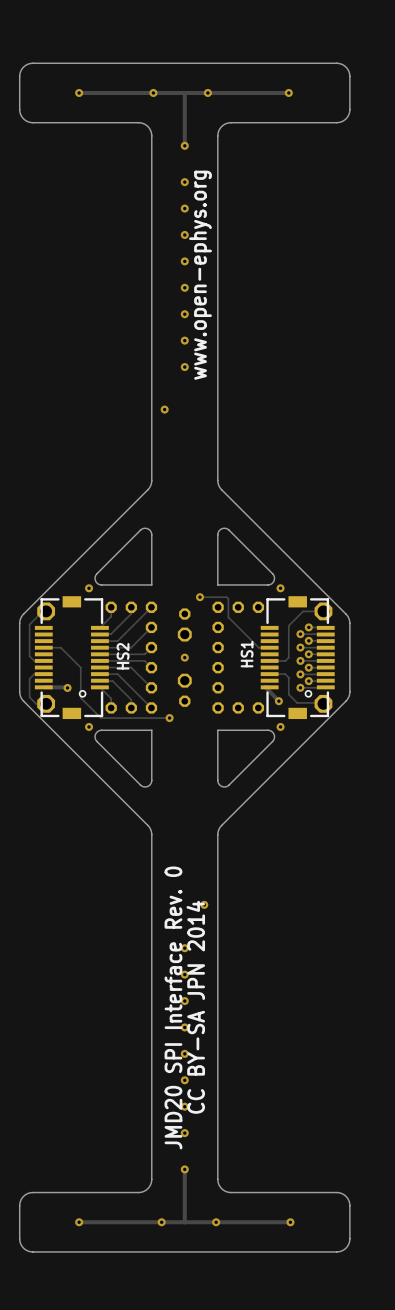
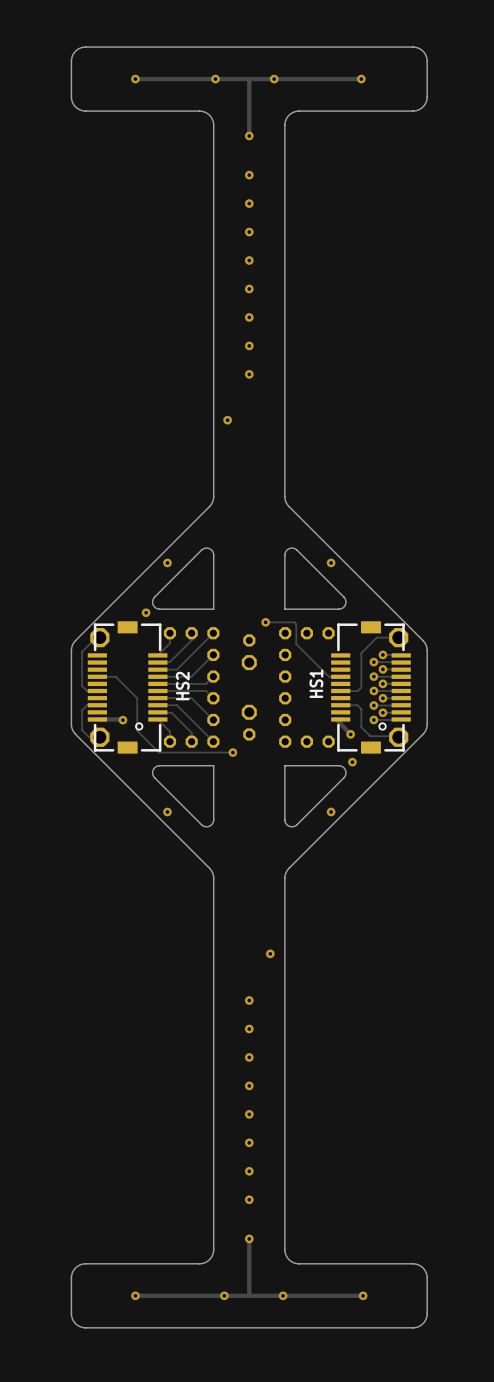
text: www.open-ephys.org (200, 275) -> none
via: none -> (167, 562)
via position: (280, 588) -> (331, 562)
via: (184, 657) -> none
via position: (89, 726) -> (167, 811)
via: none -> (331, 811)
text: JMD20 SPI Interface Rev. 0 (173, 1007) -> none
text: CC BY-SA JPN 2014 (195, 1007) -> none

